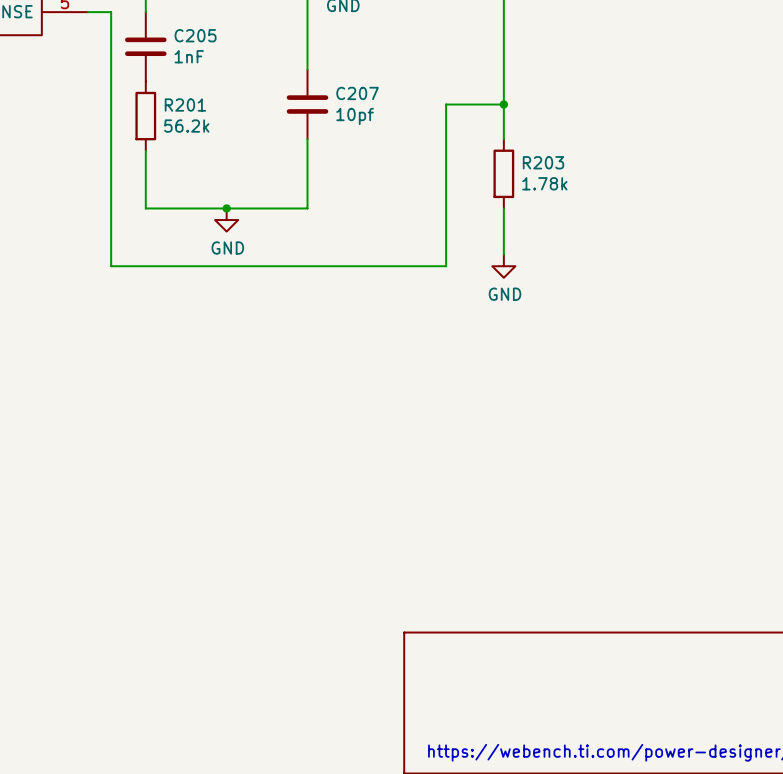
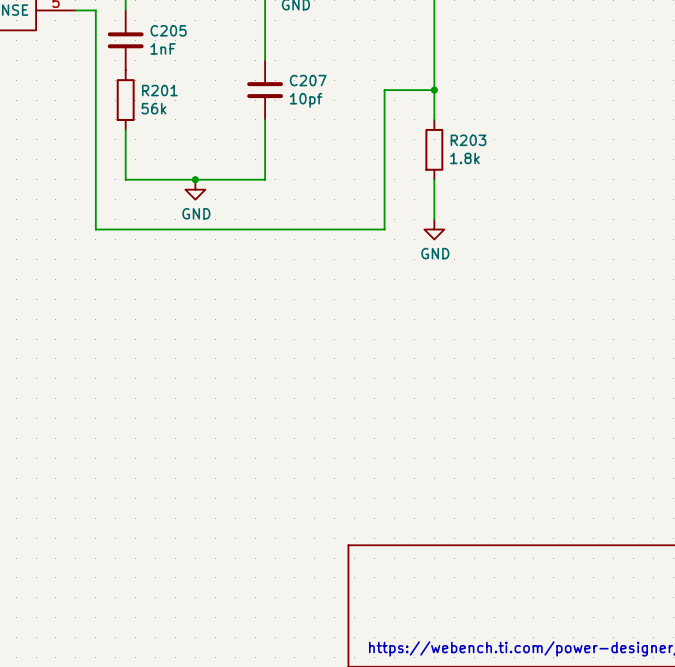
R201 value: 56.2k (186, 126) -> 56k (153, 108)
R203 value: 1.78k (544, 183) -> 1.8k (464, 158)

